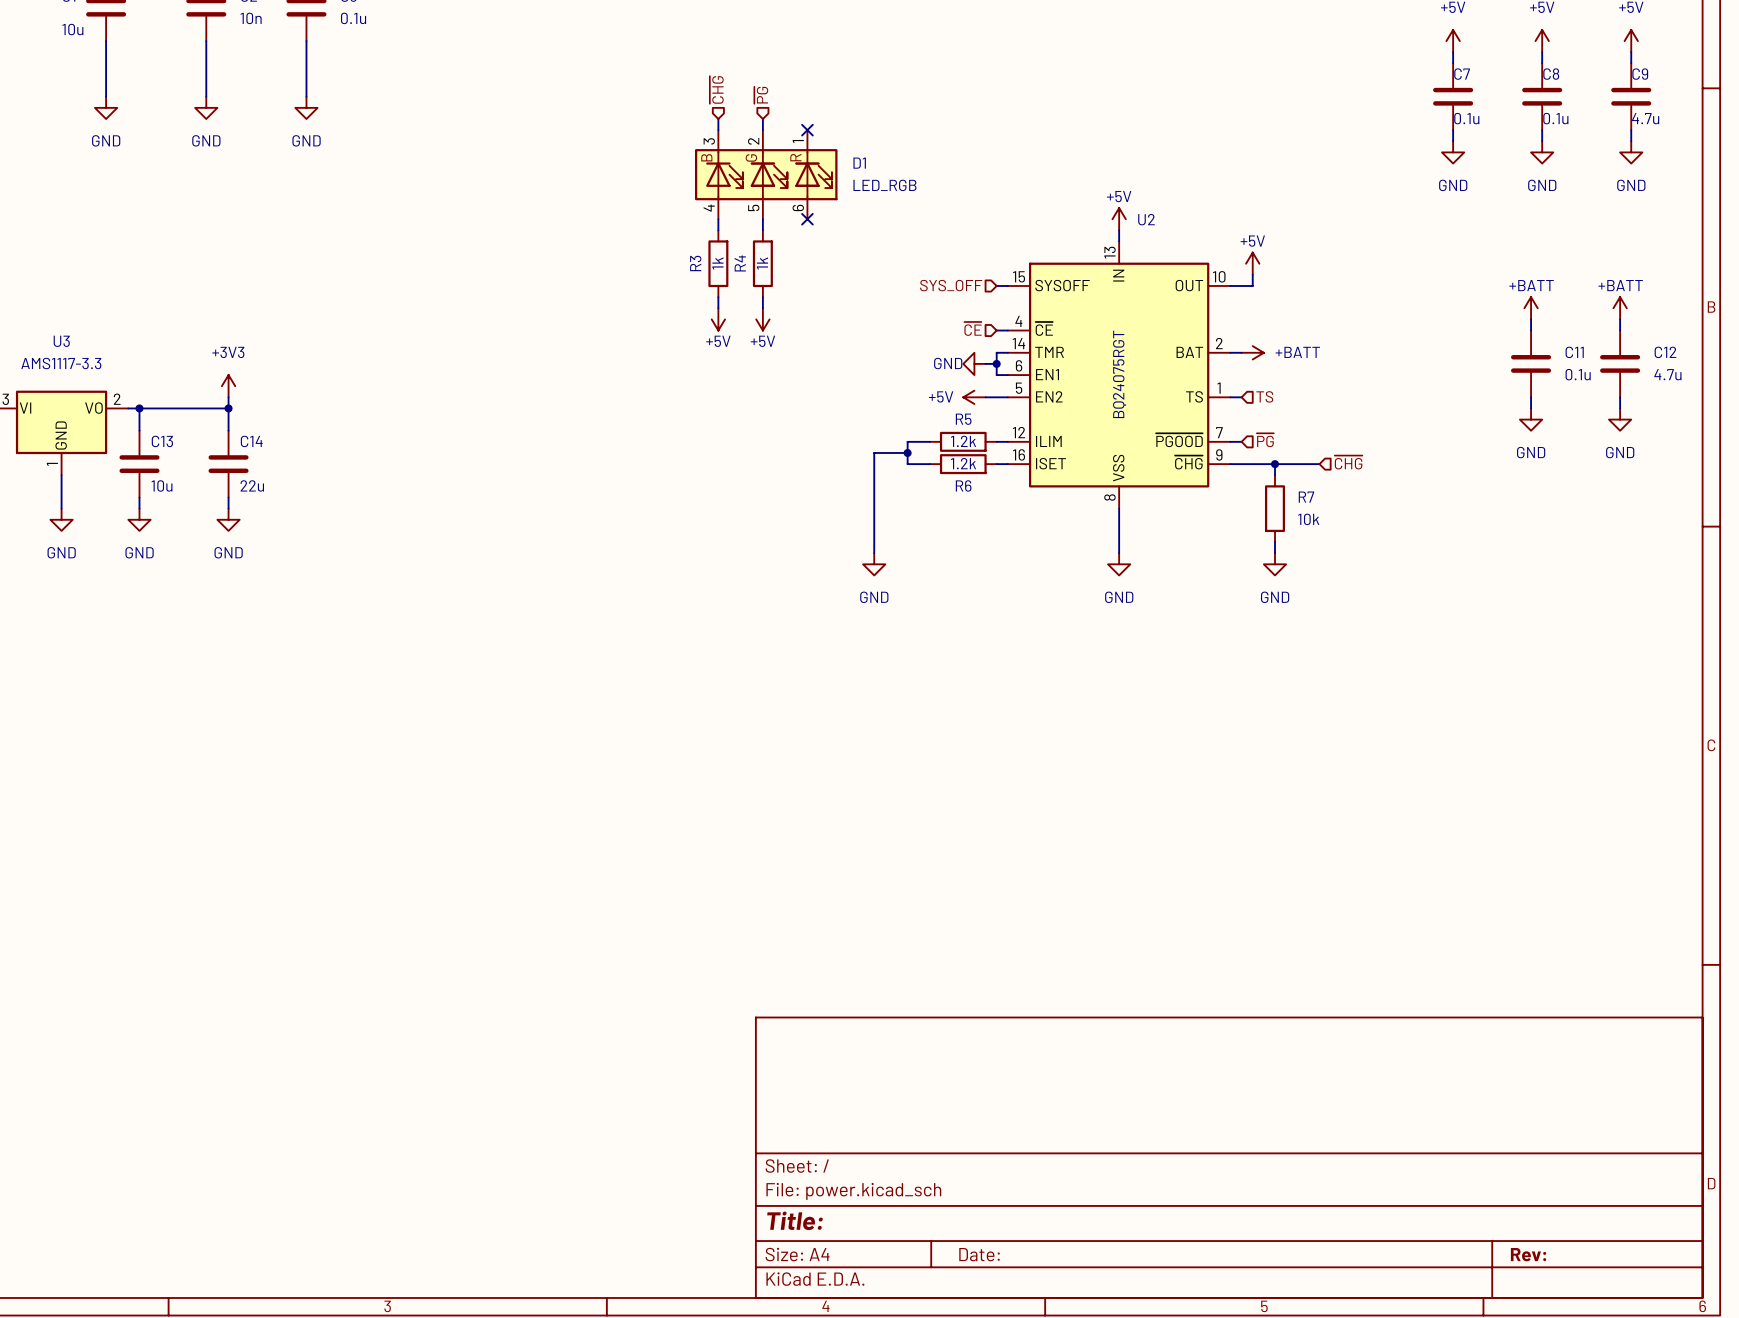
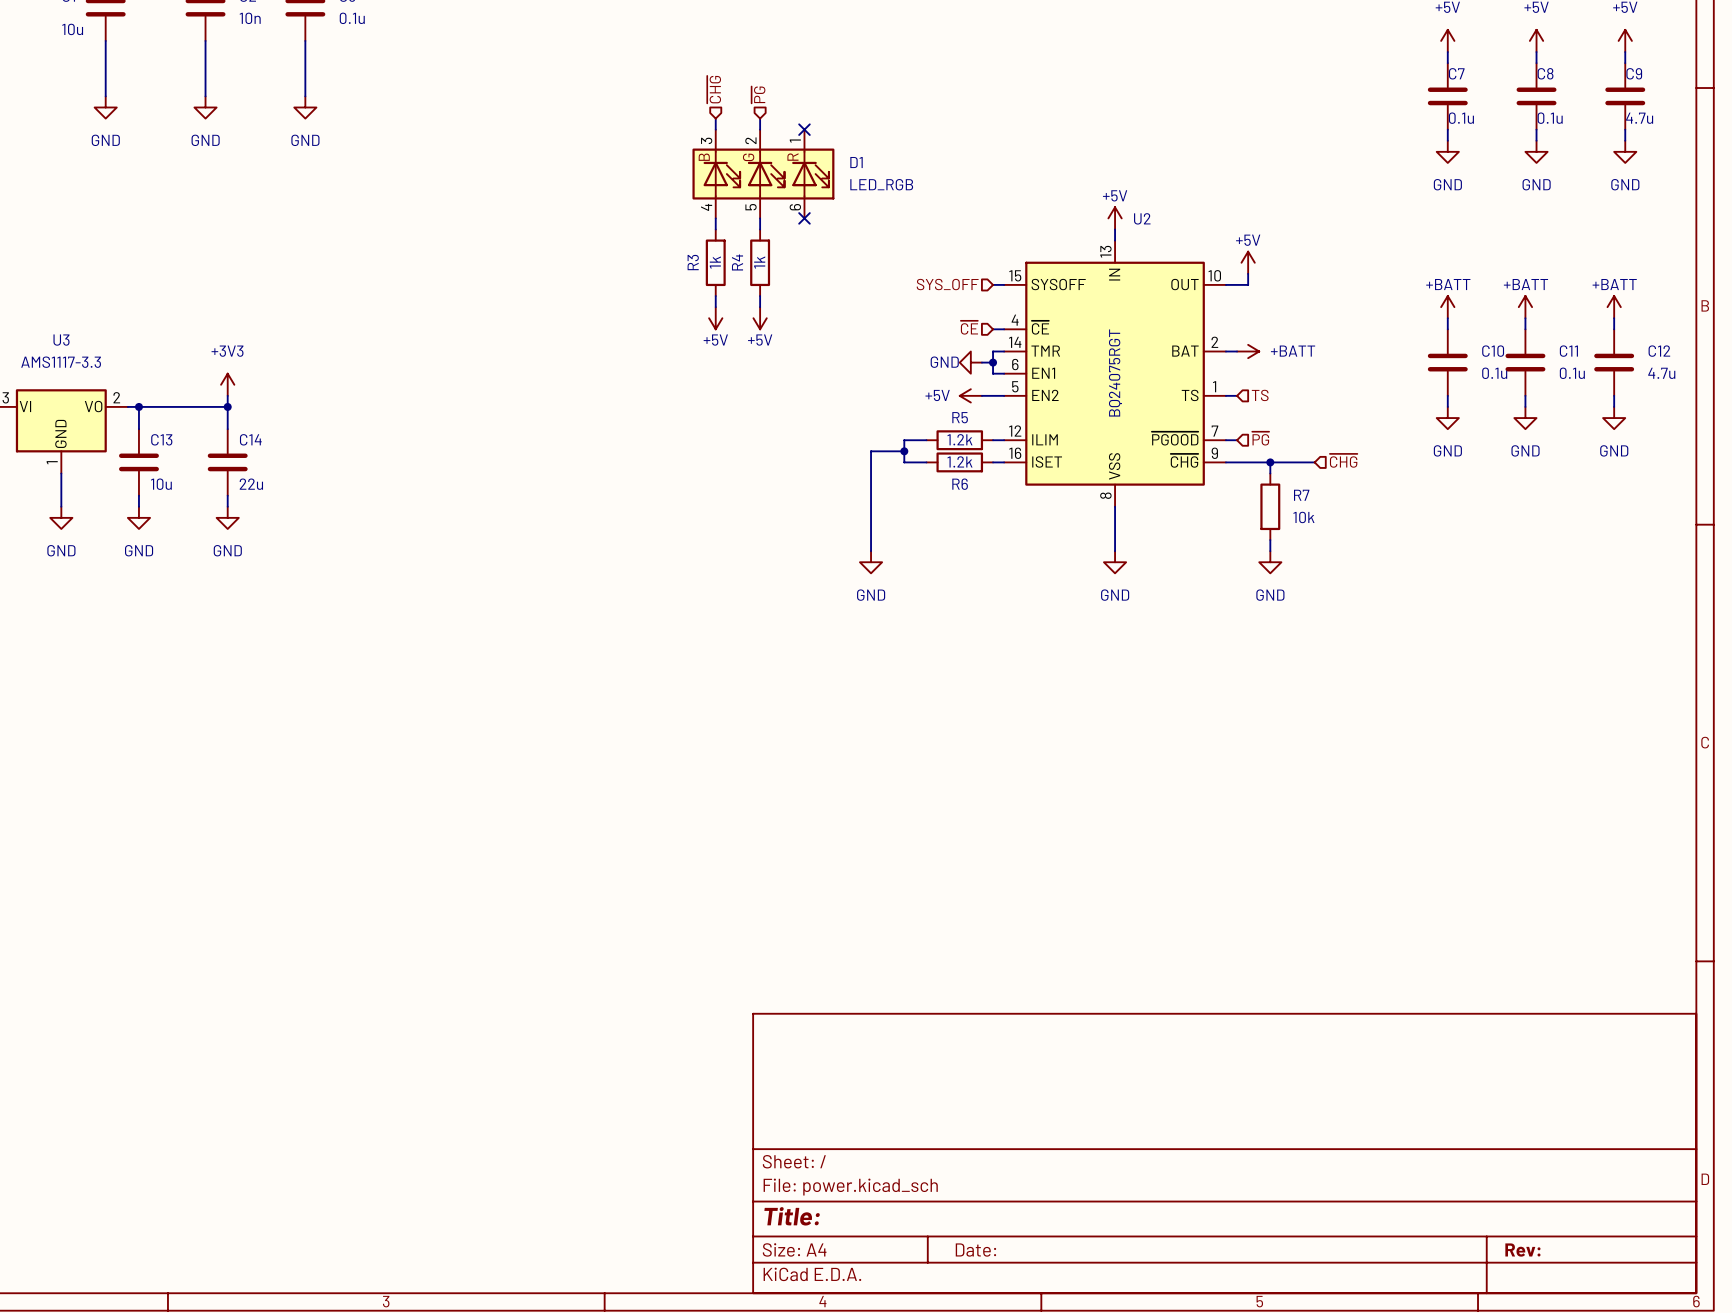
power symbol: none -> +BATT (1447, 307)
wire: none -> (1447, 318) (1447, 329)
C10: none -> 0.1u (1447, 362)
wire: none -> (1447, 395) (1447, 406)
power symbol: none -> GND (1447, 418)

